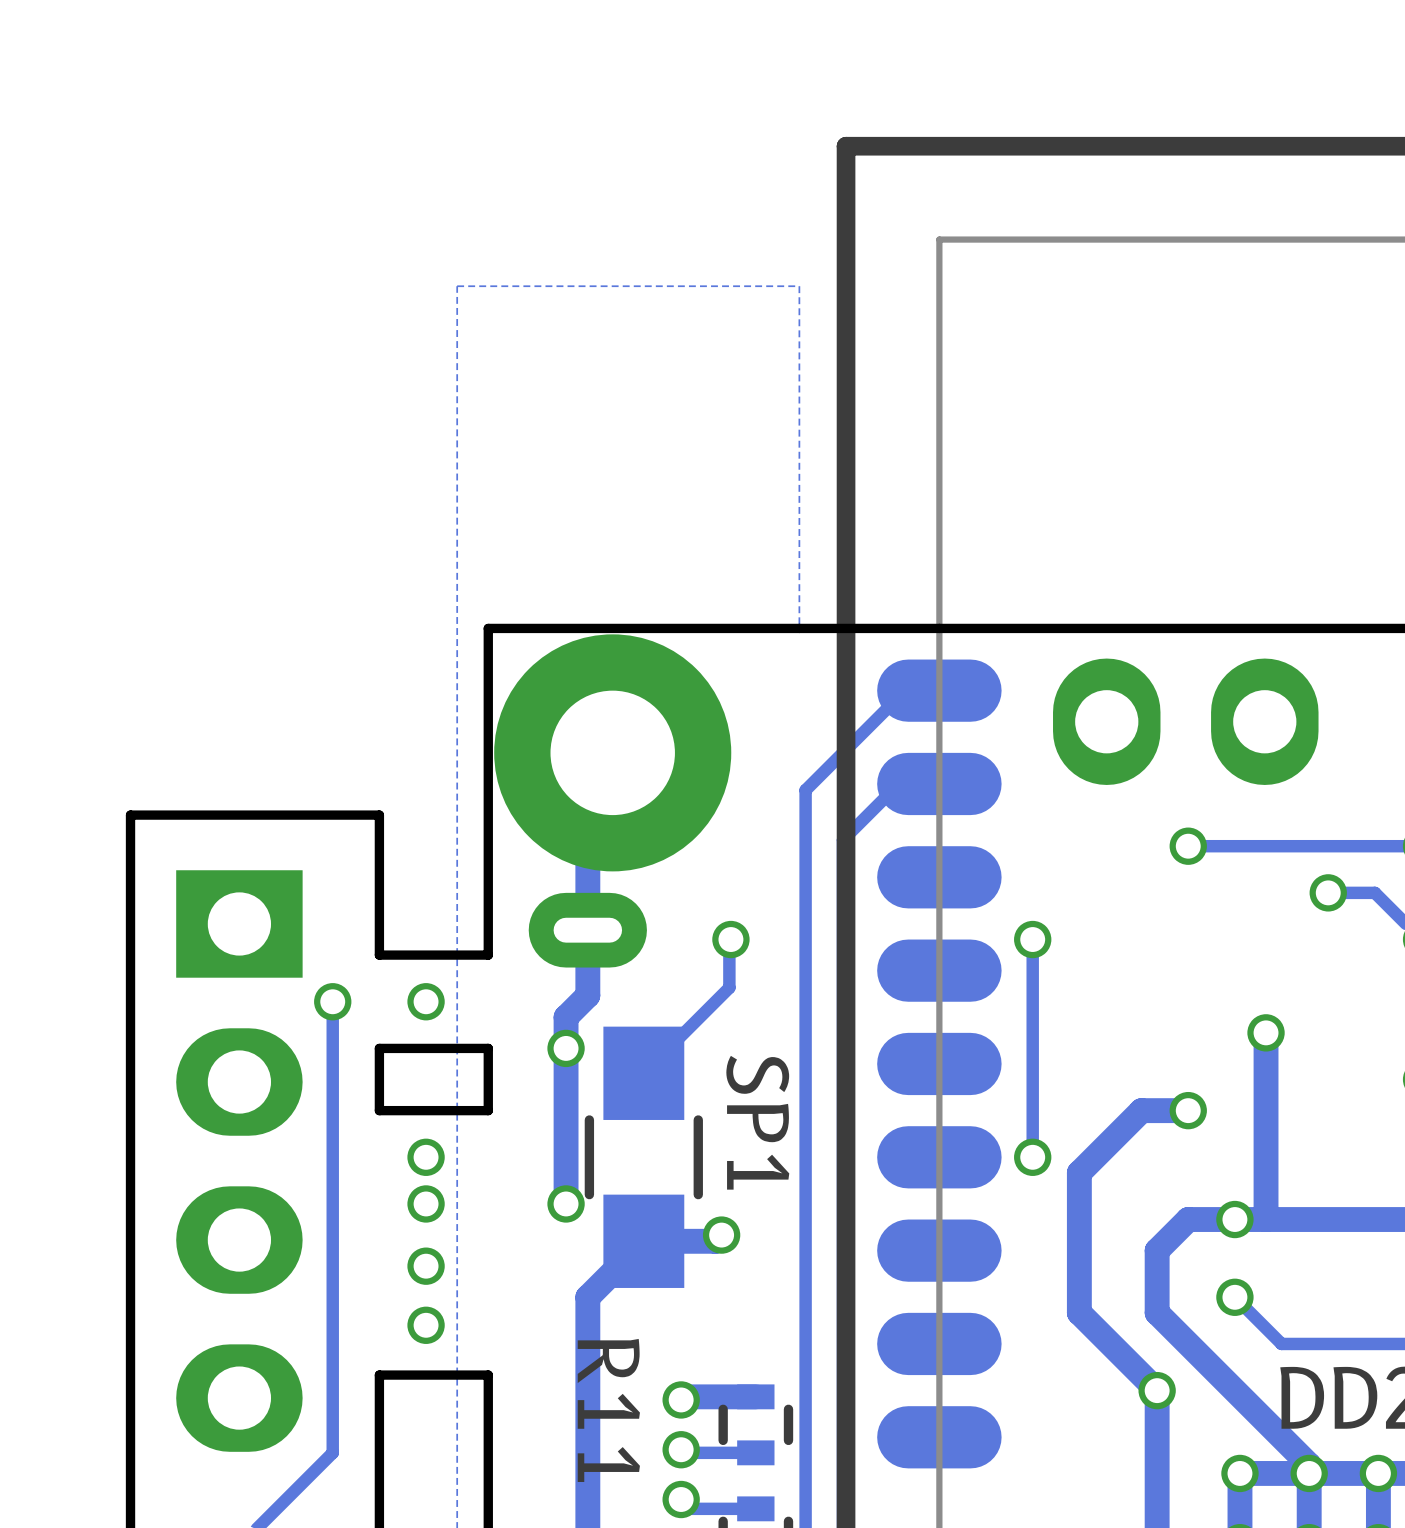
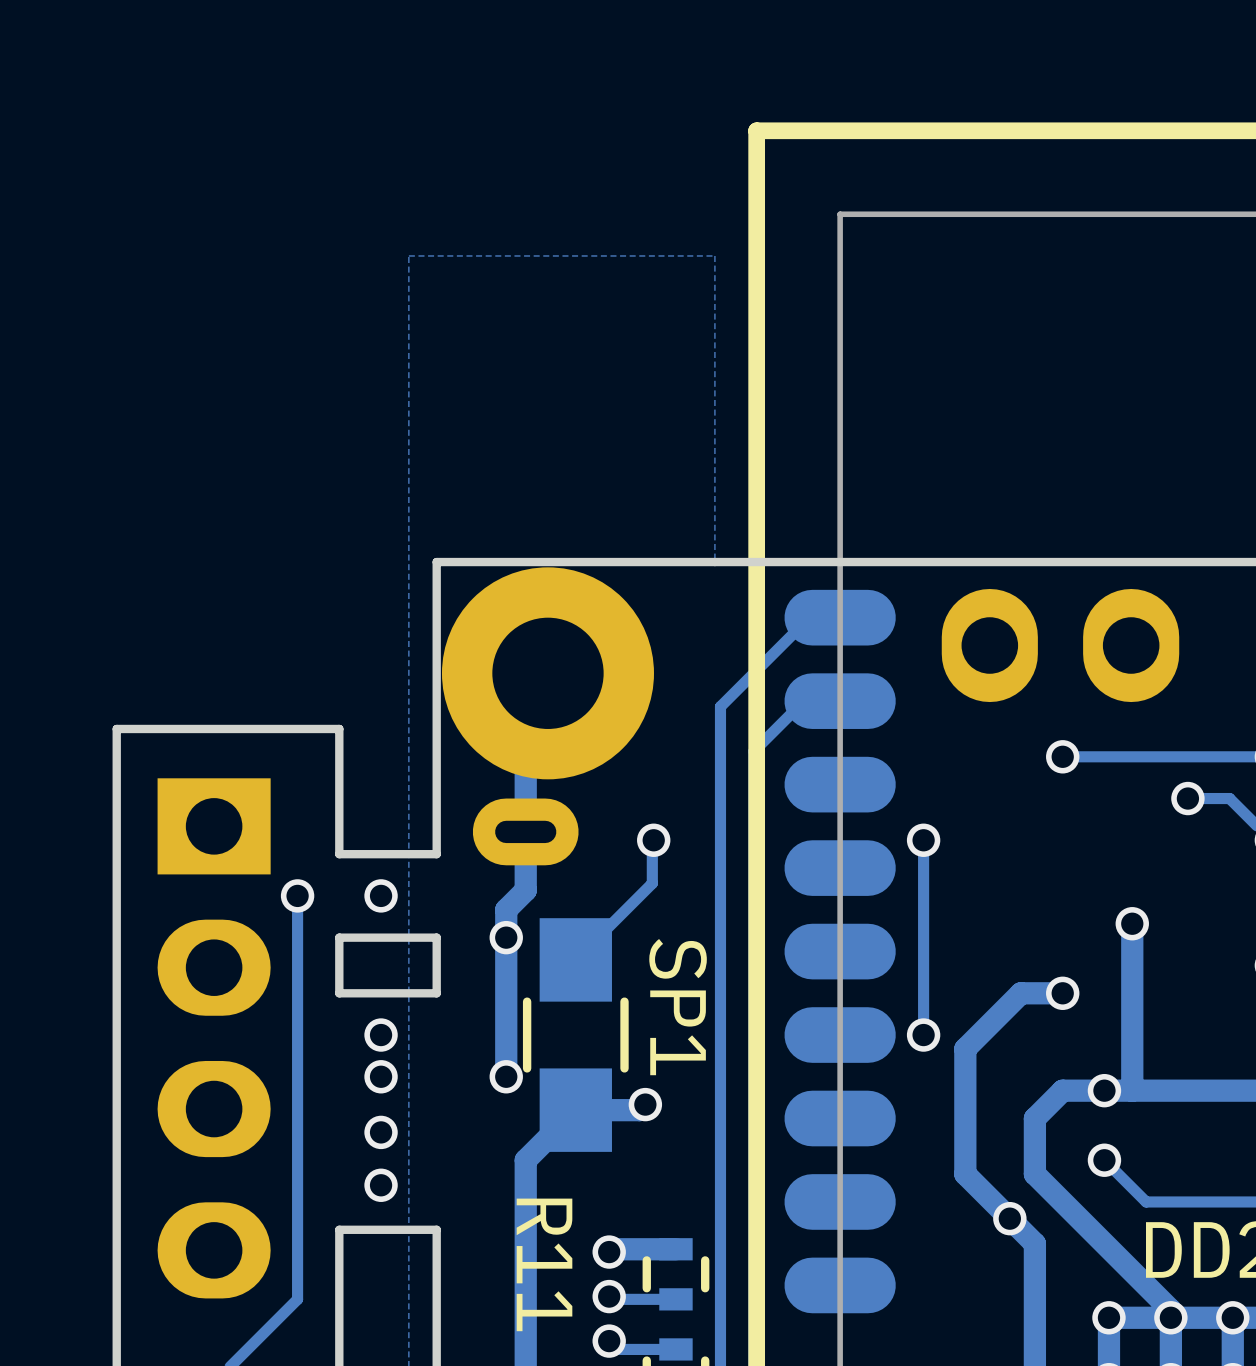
via position: (1157, 1390) -> (1009, 1218)

